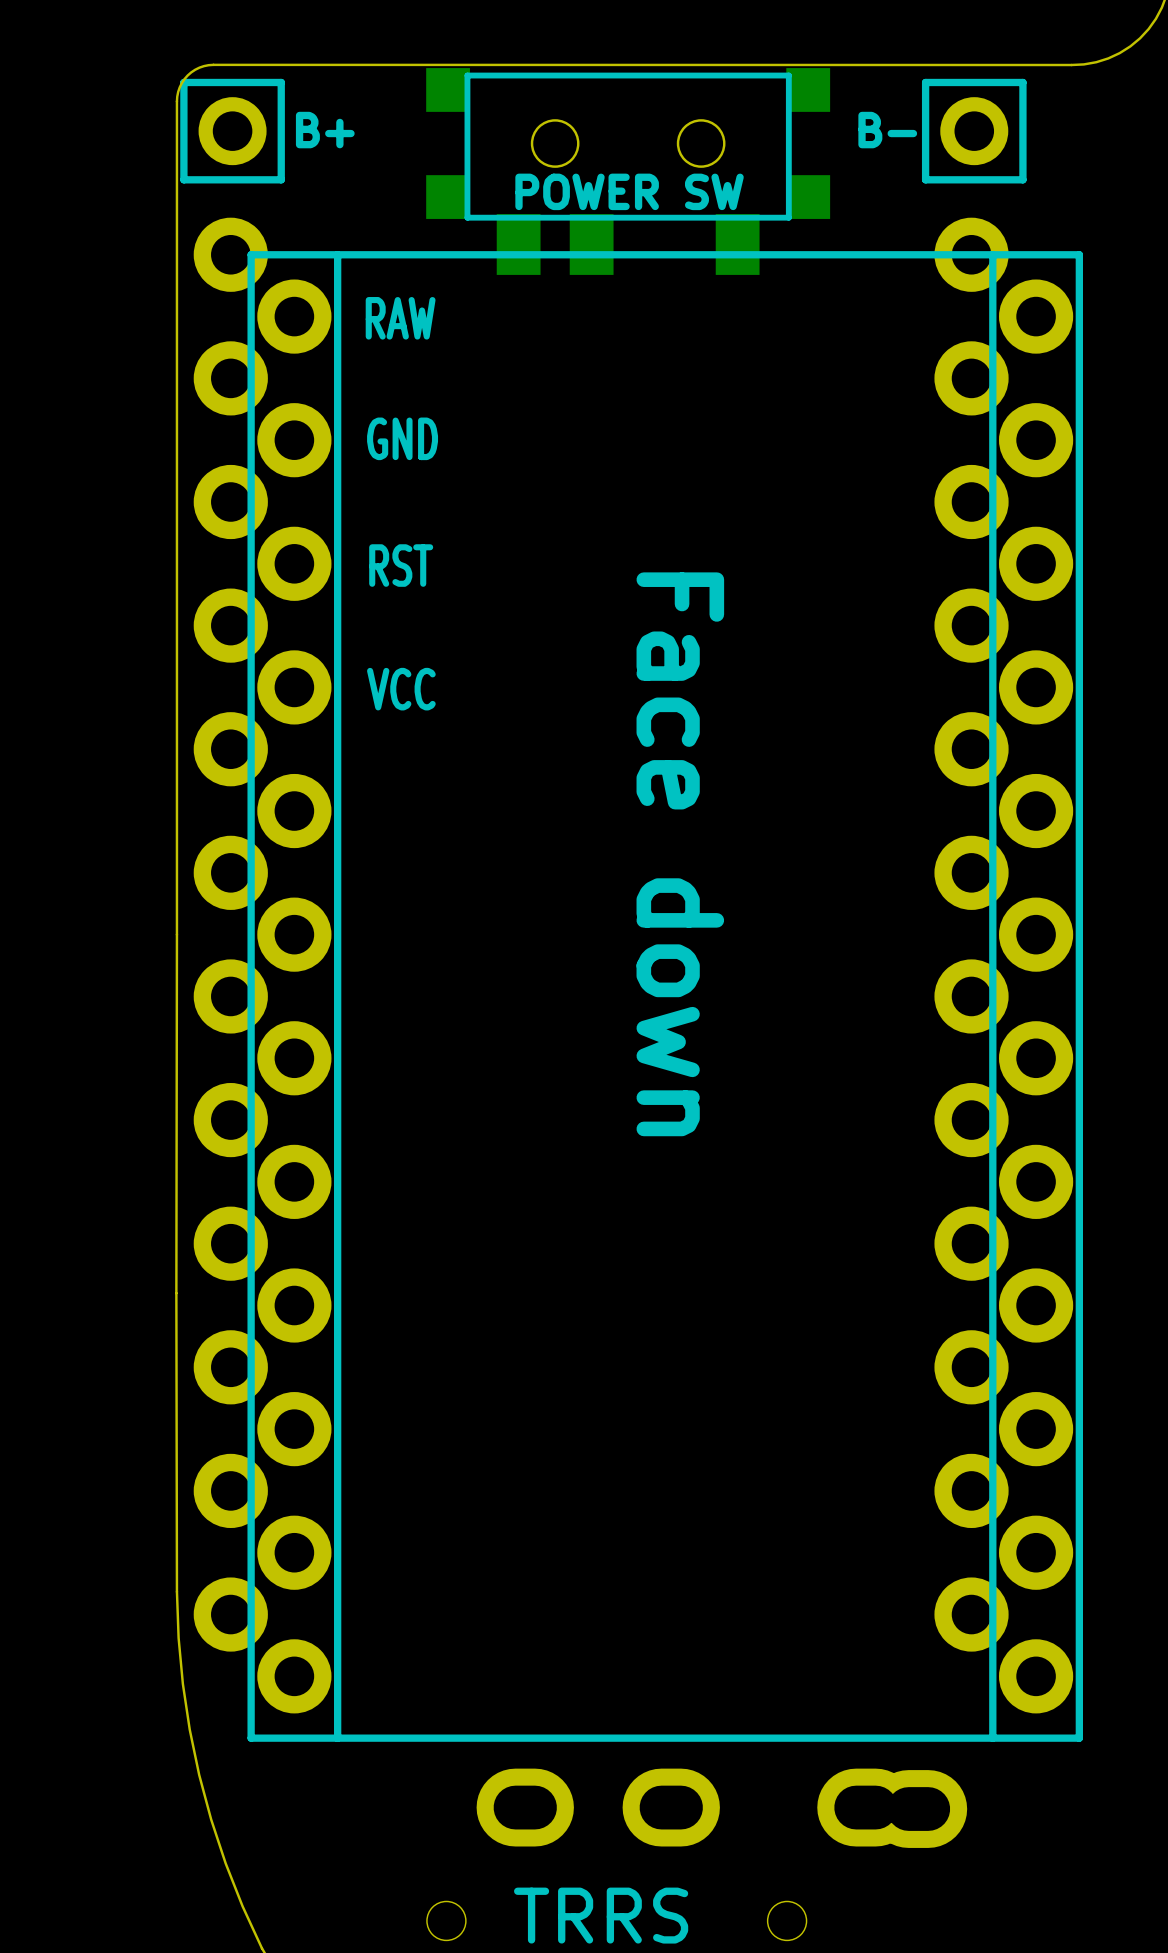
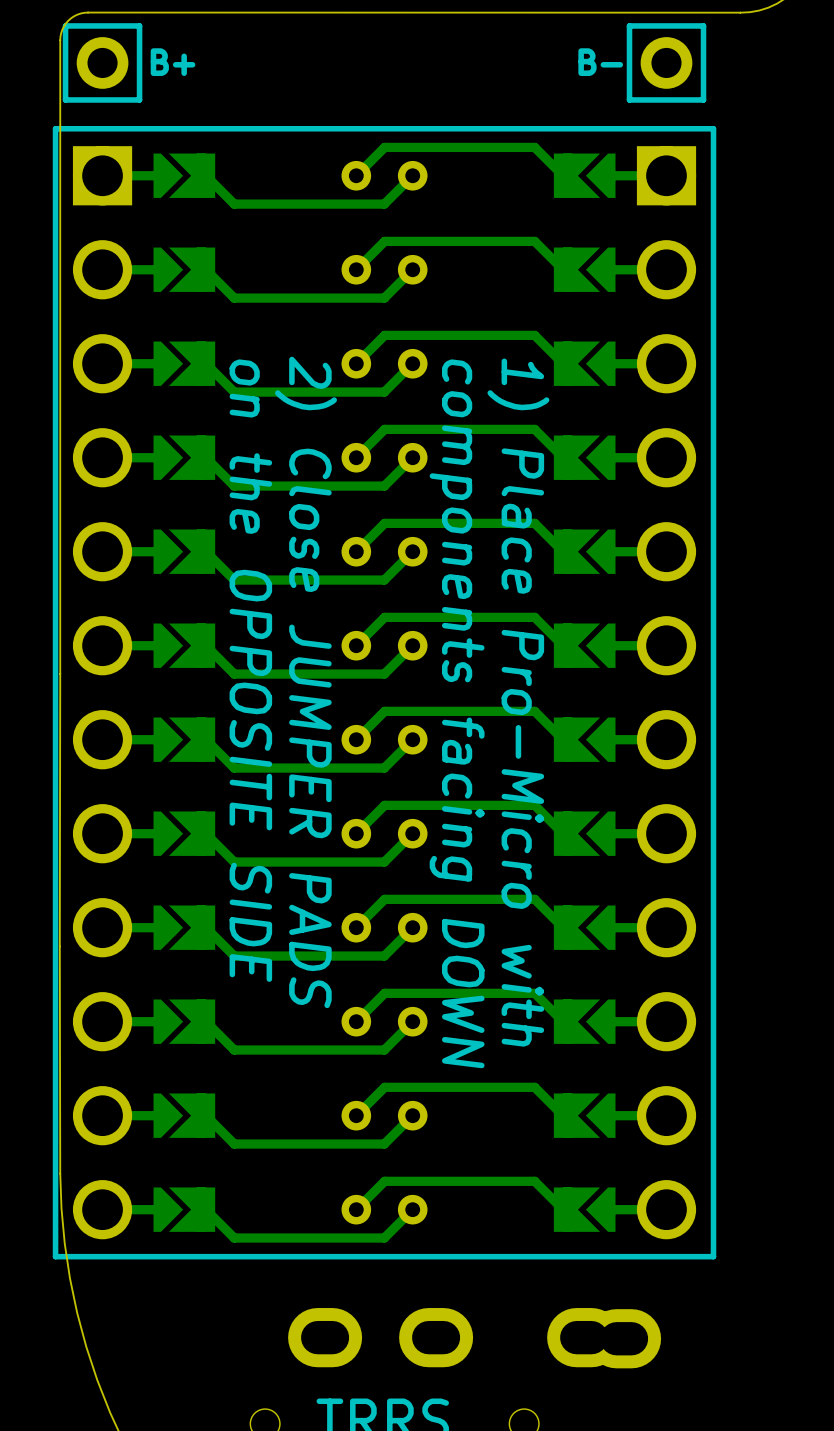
line: (788, 75) (788, 217) (467, 217) (467, 75) (788, 75) -> none
POWER SW: (628, 171) -> none
part footprint: [193, 217, 1083, 1742] -> [52, 125, 717, 1260]
text: Face down (680, 854) -> none
text: none -> on the OPPOSITE SIDE (250, 670)
text: none -> 2) Close JUMPER PADS (306, 682)
text: none -> 1) Place Pro-Micro with (518, 702)
text: none -> components facing DOWN (457, 713)

